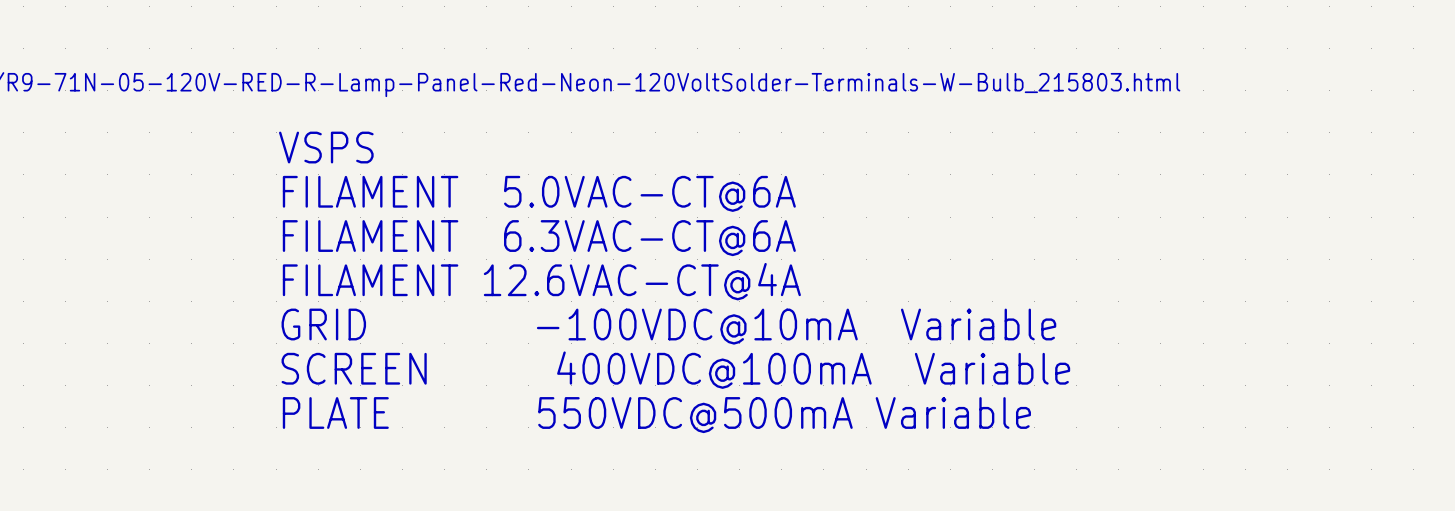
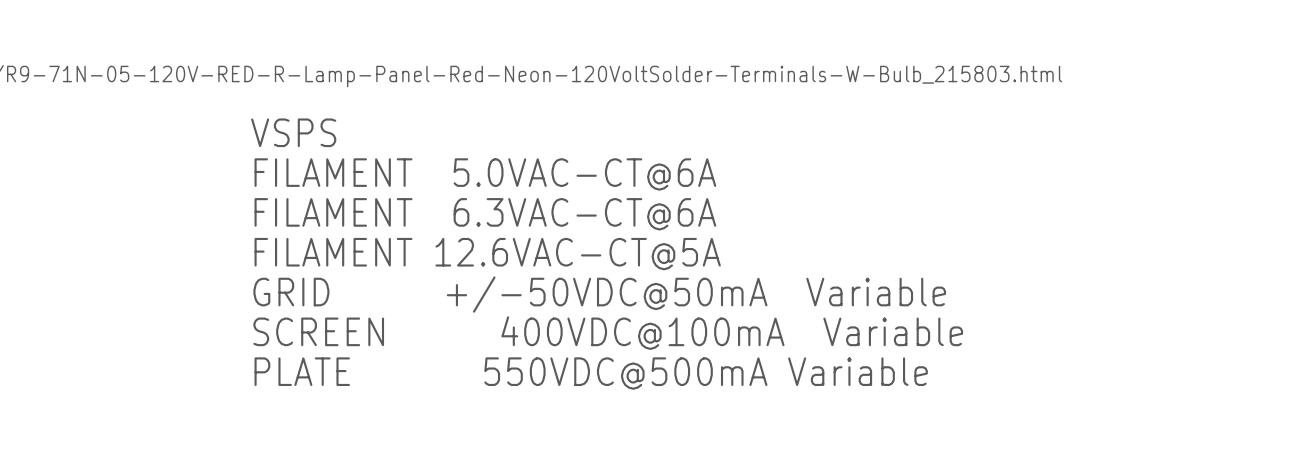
text: FILAMENT 12.6VAC-CT@4A (541, 281) -> FILAMENT 12.6VAC-CT@5A (487, 254)
text: GRID -100VDC@10mA Variable (668, 326) -> GRID +/-50VDC@50mA Variable (599, 294)

